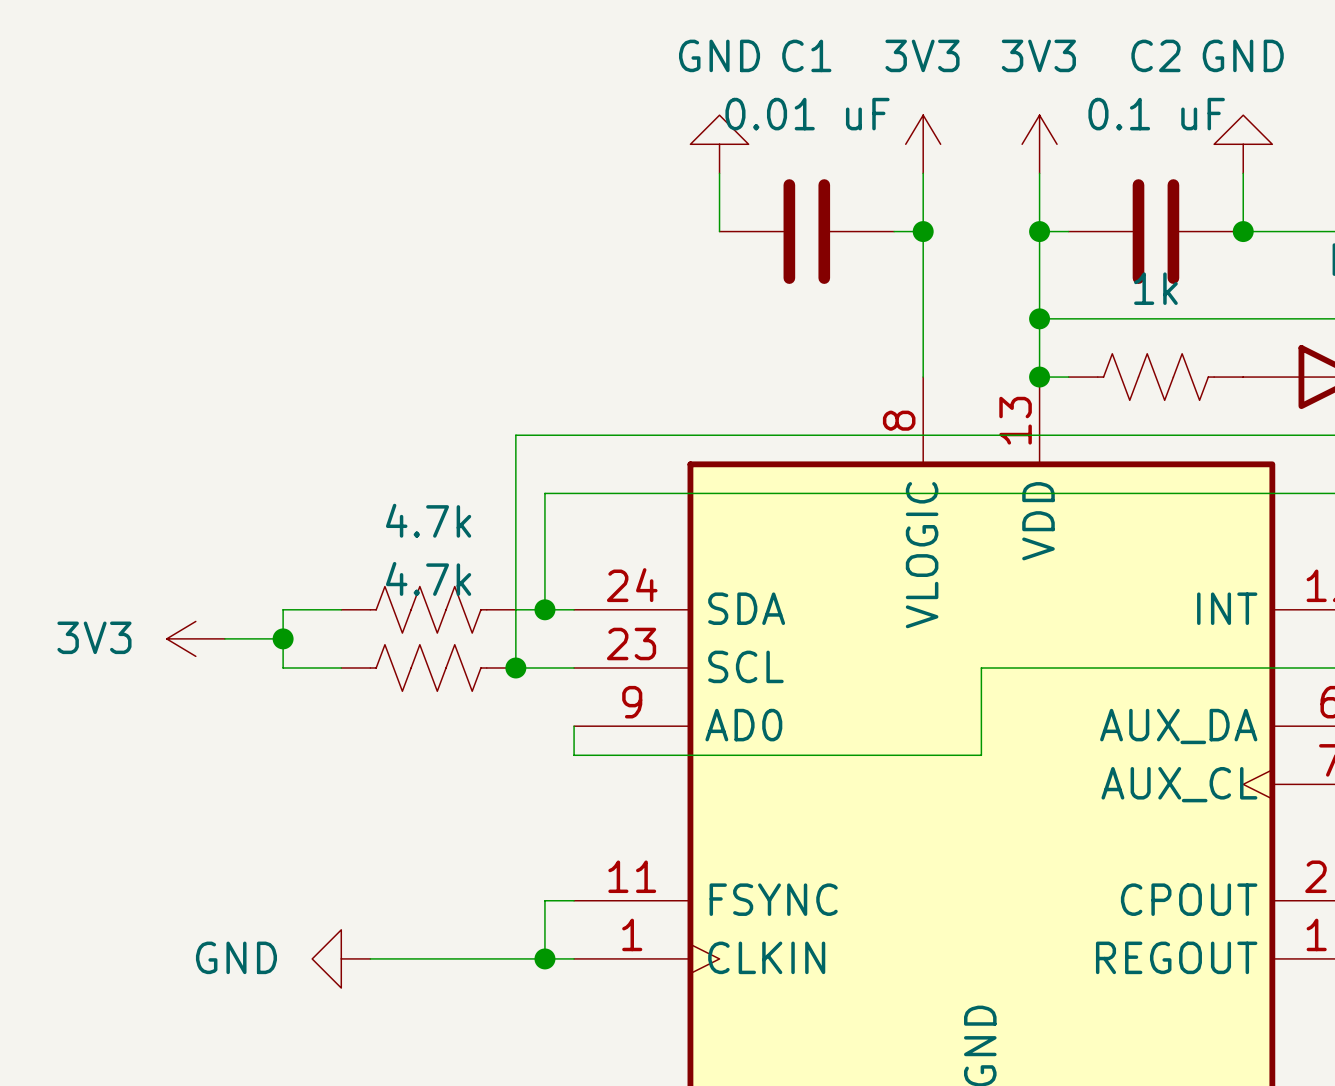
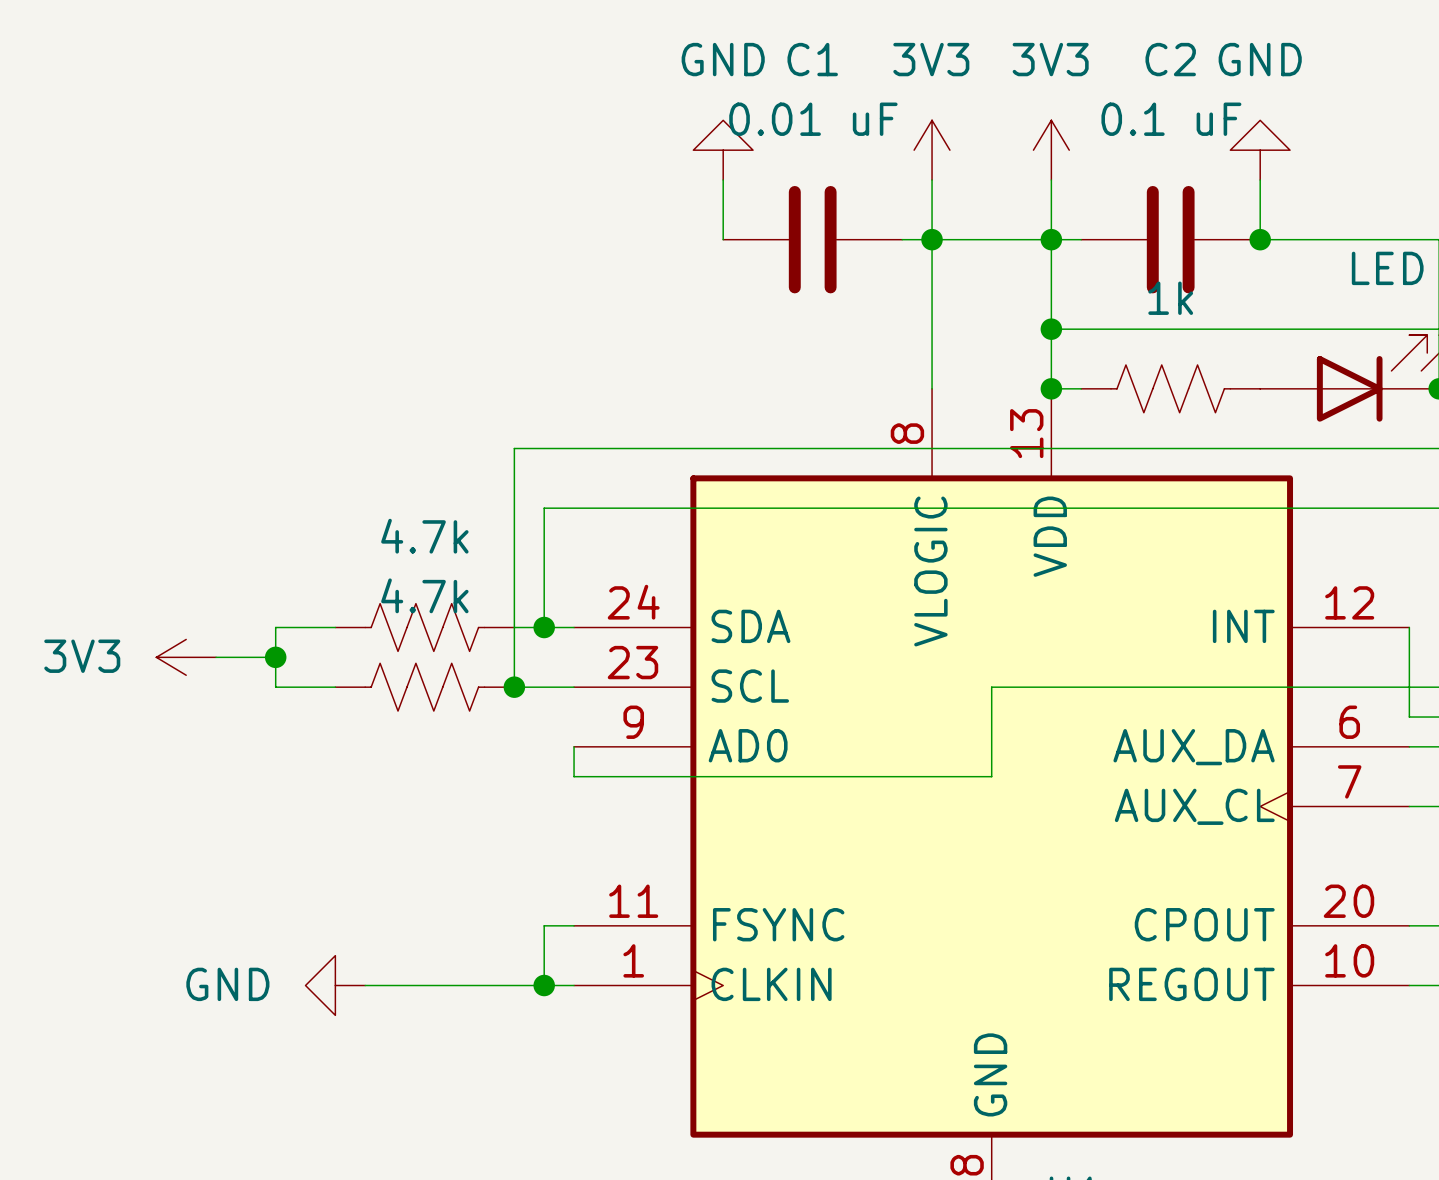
wire: none -> (932, 239) (1051, 239)

